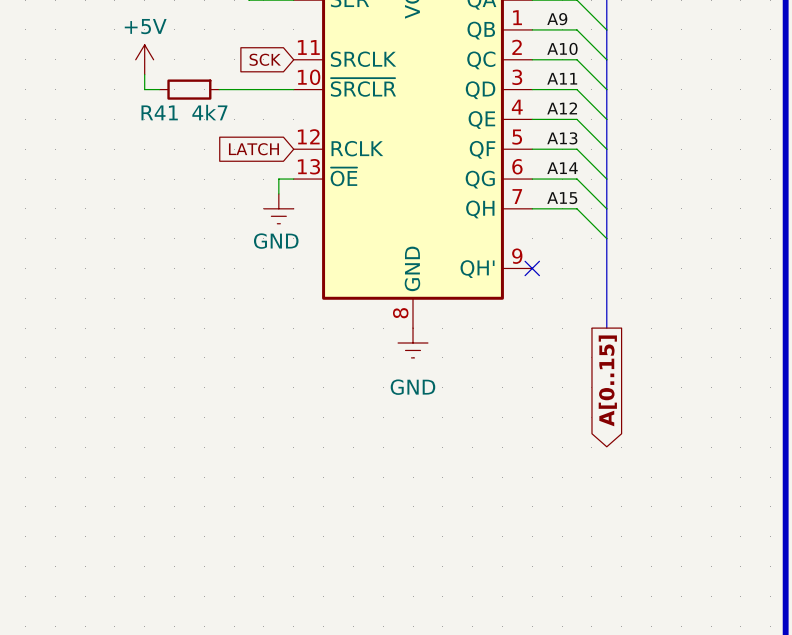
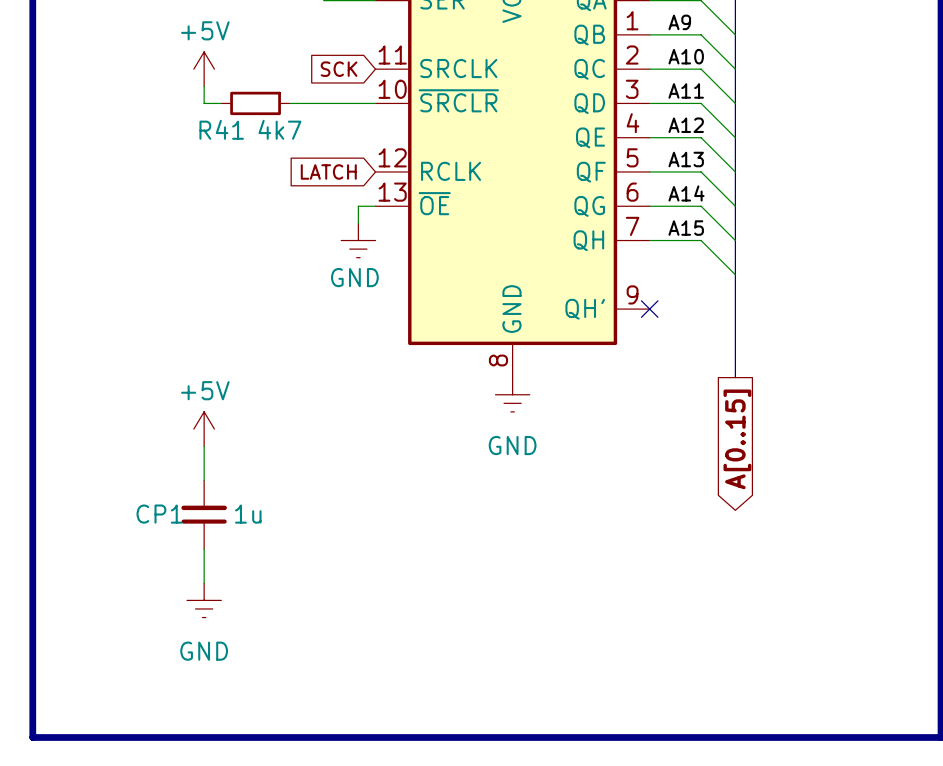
power symbol: none -> +5V (204, 429)
wire: none -> (204, 446) (204, 480)
CP1: none -> 1u (204, 514)
wire: none -> (204, 548) (204, 583)
power symbol: none -> GND (204, 600)

